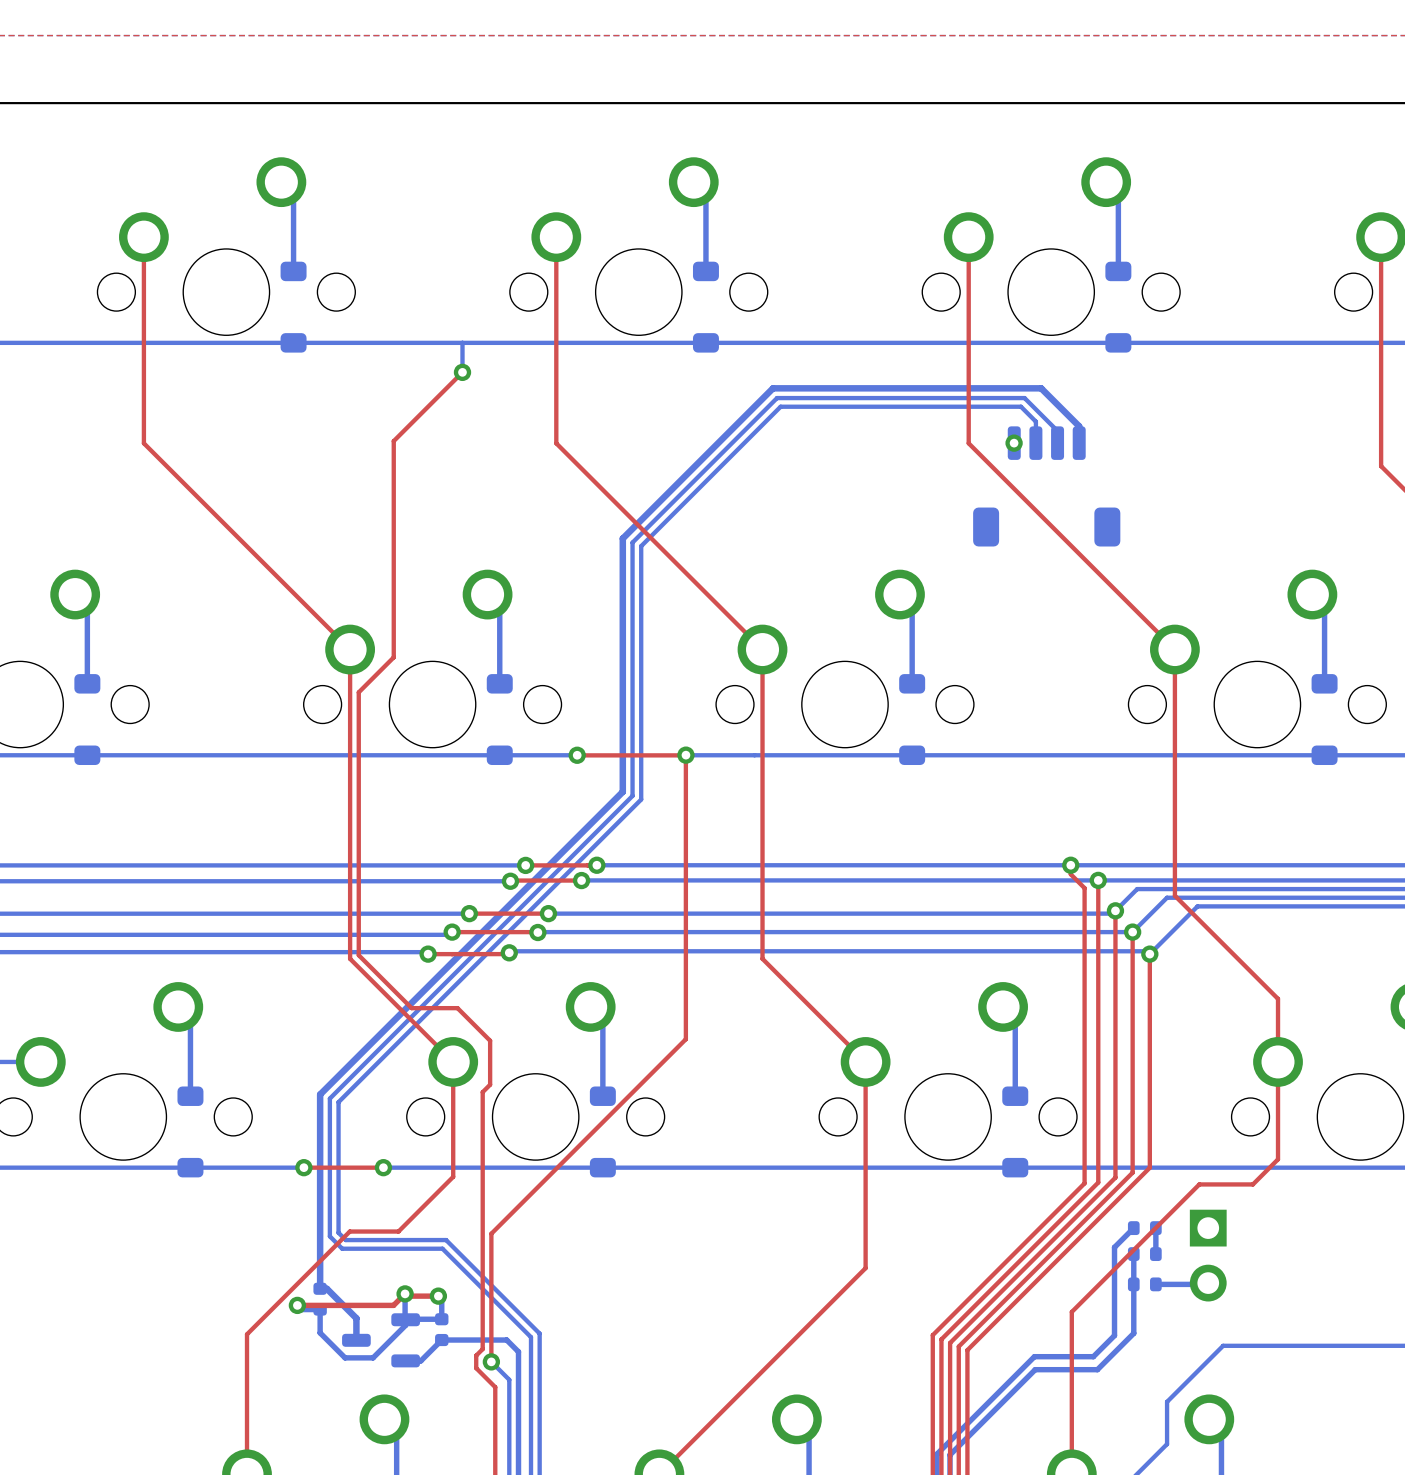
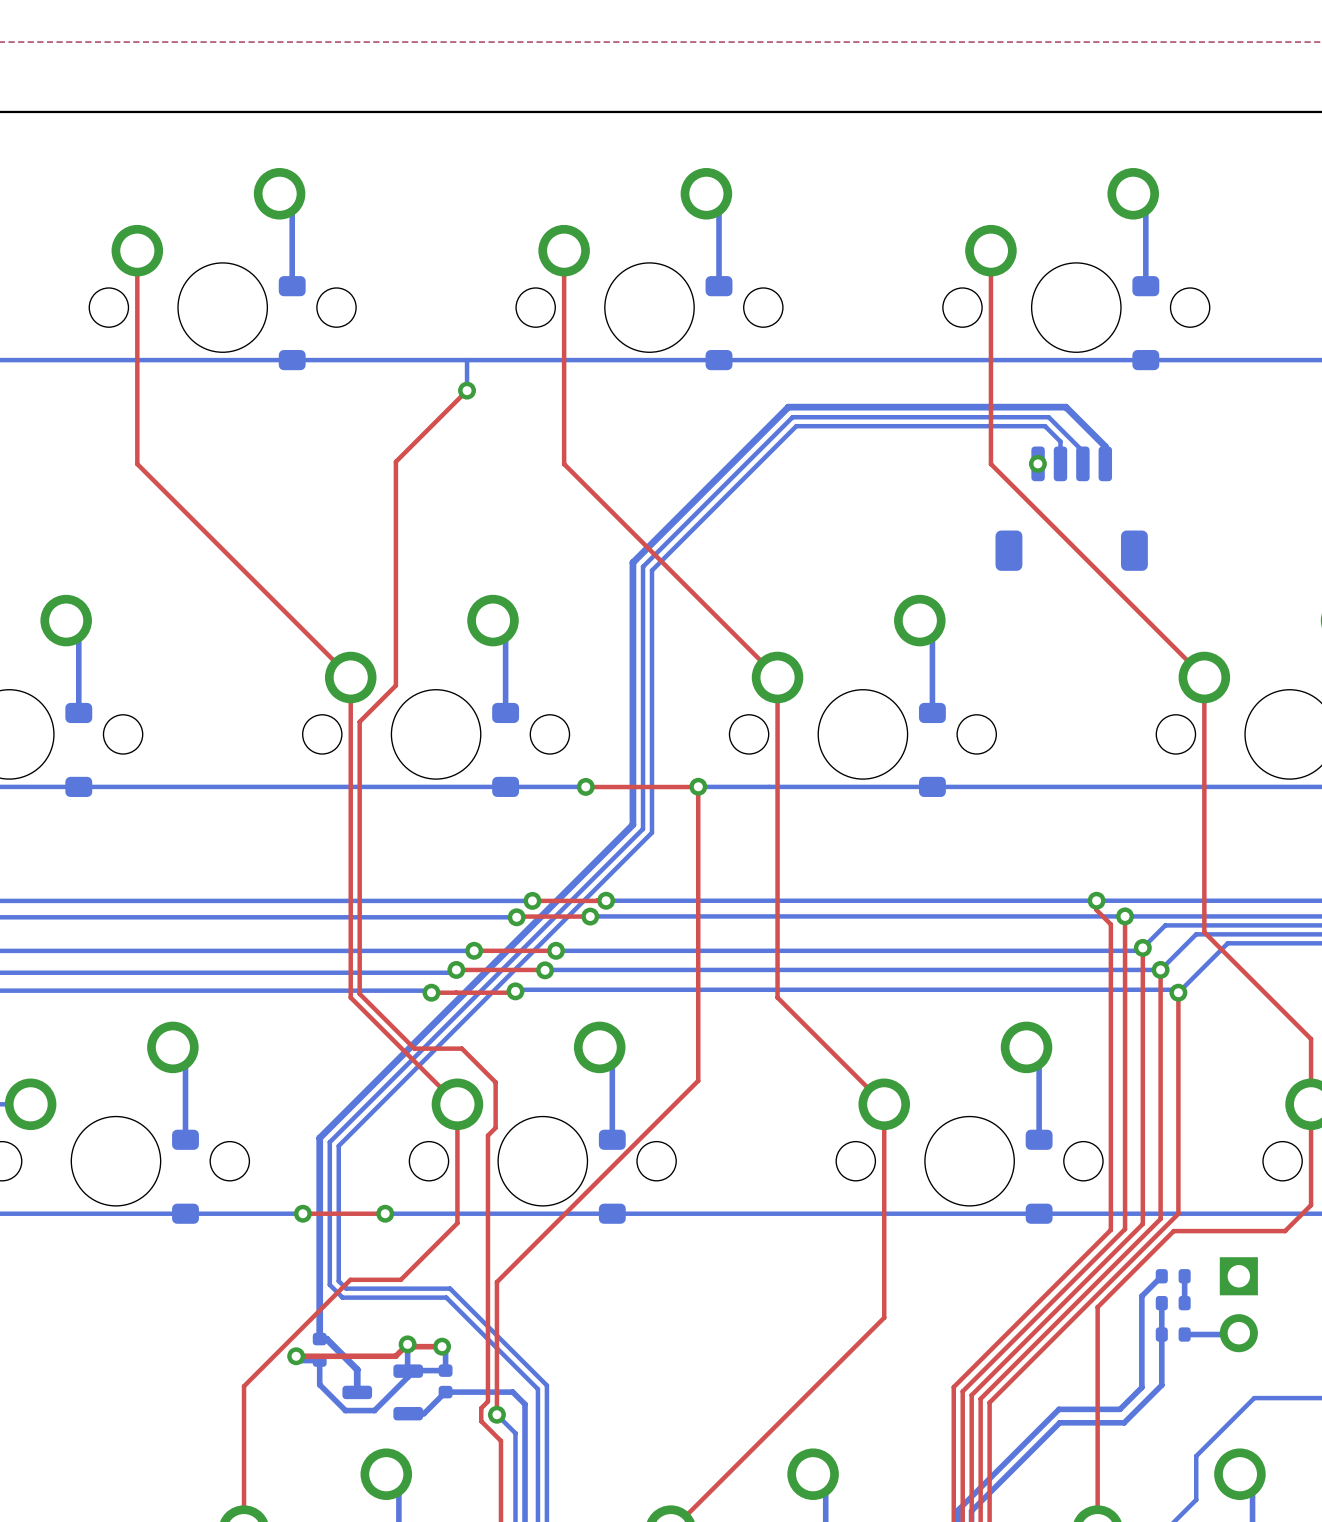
top track: (1199, 1184) (1071, 1311) -> (1229, 1231) (1173, 1231) (1097, 1307) (1097, 1363)

